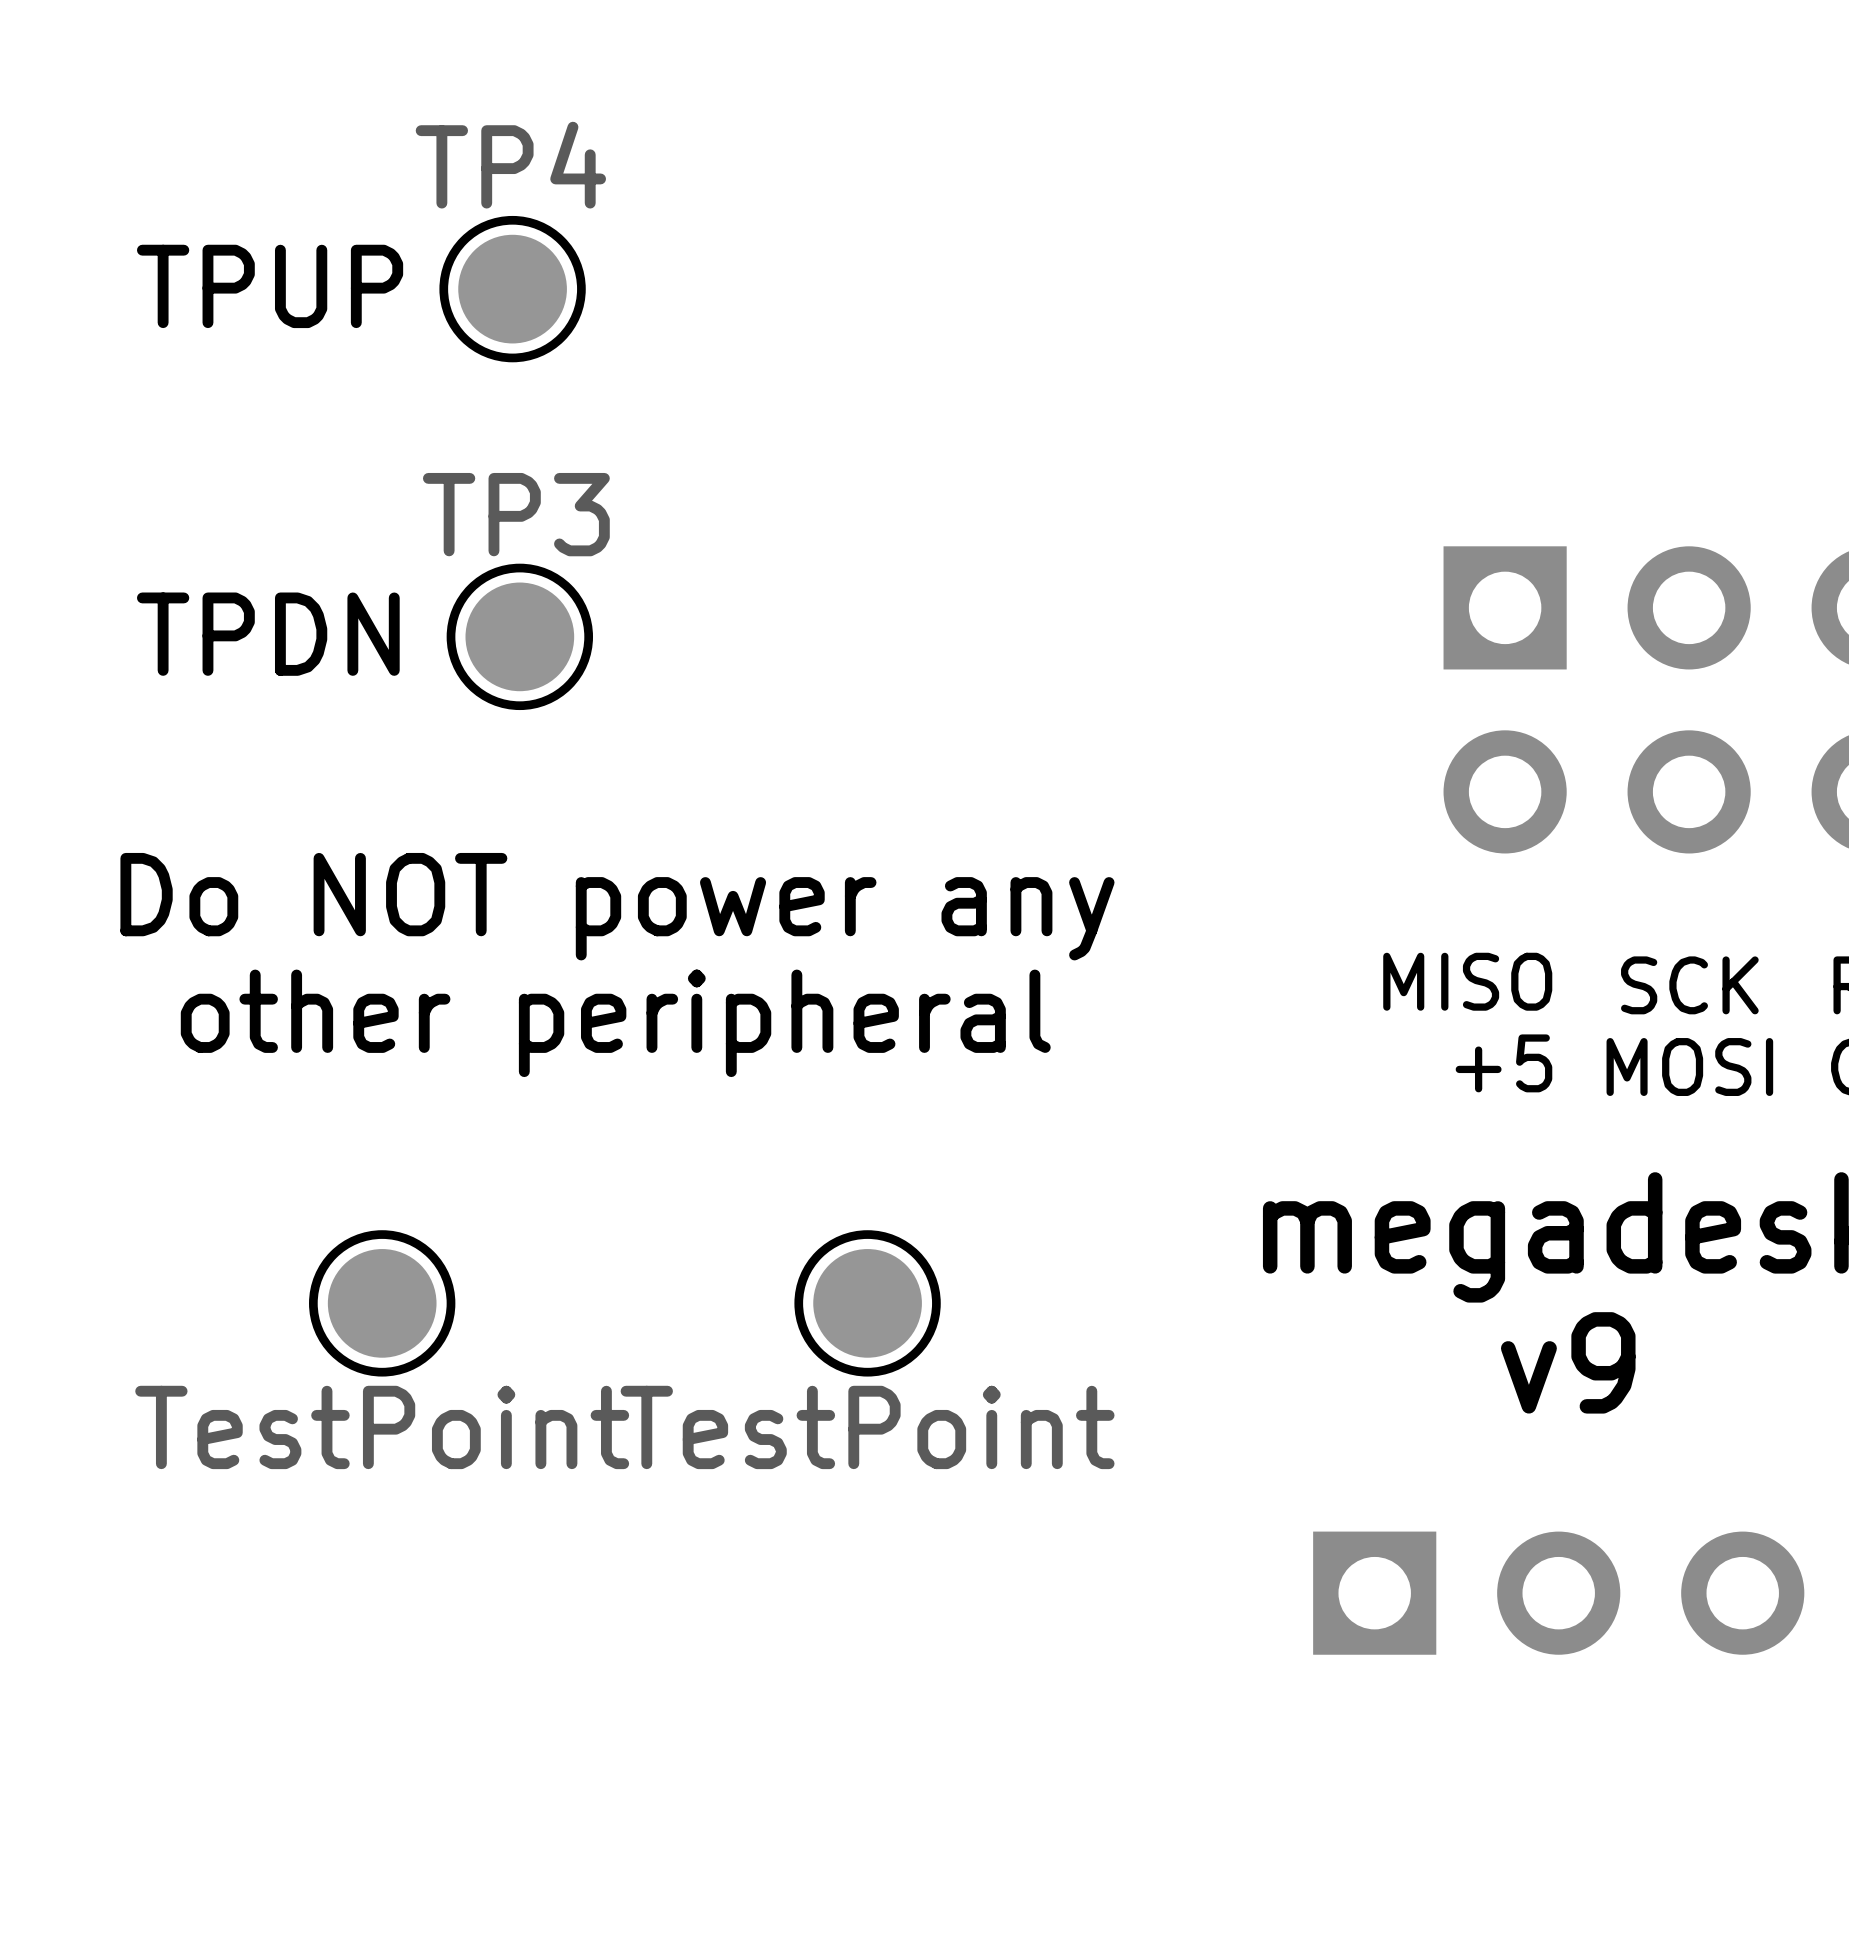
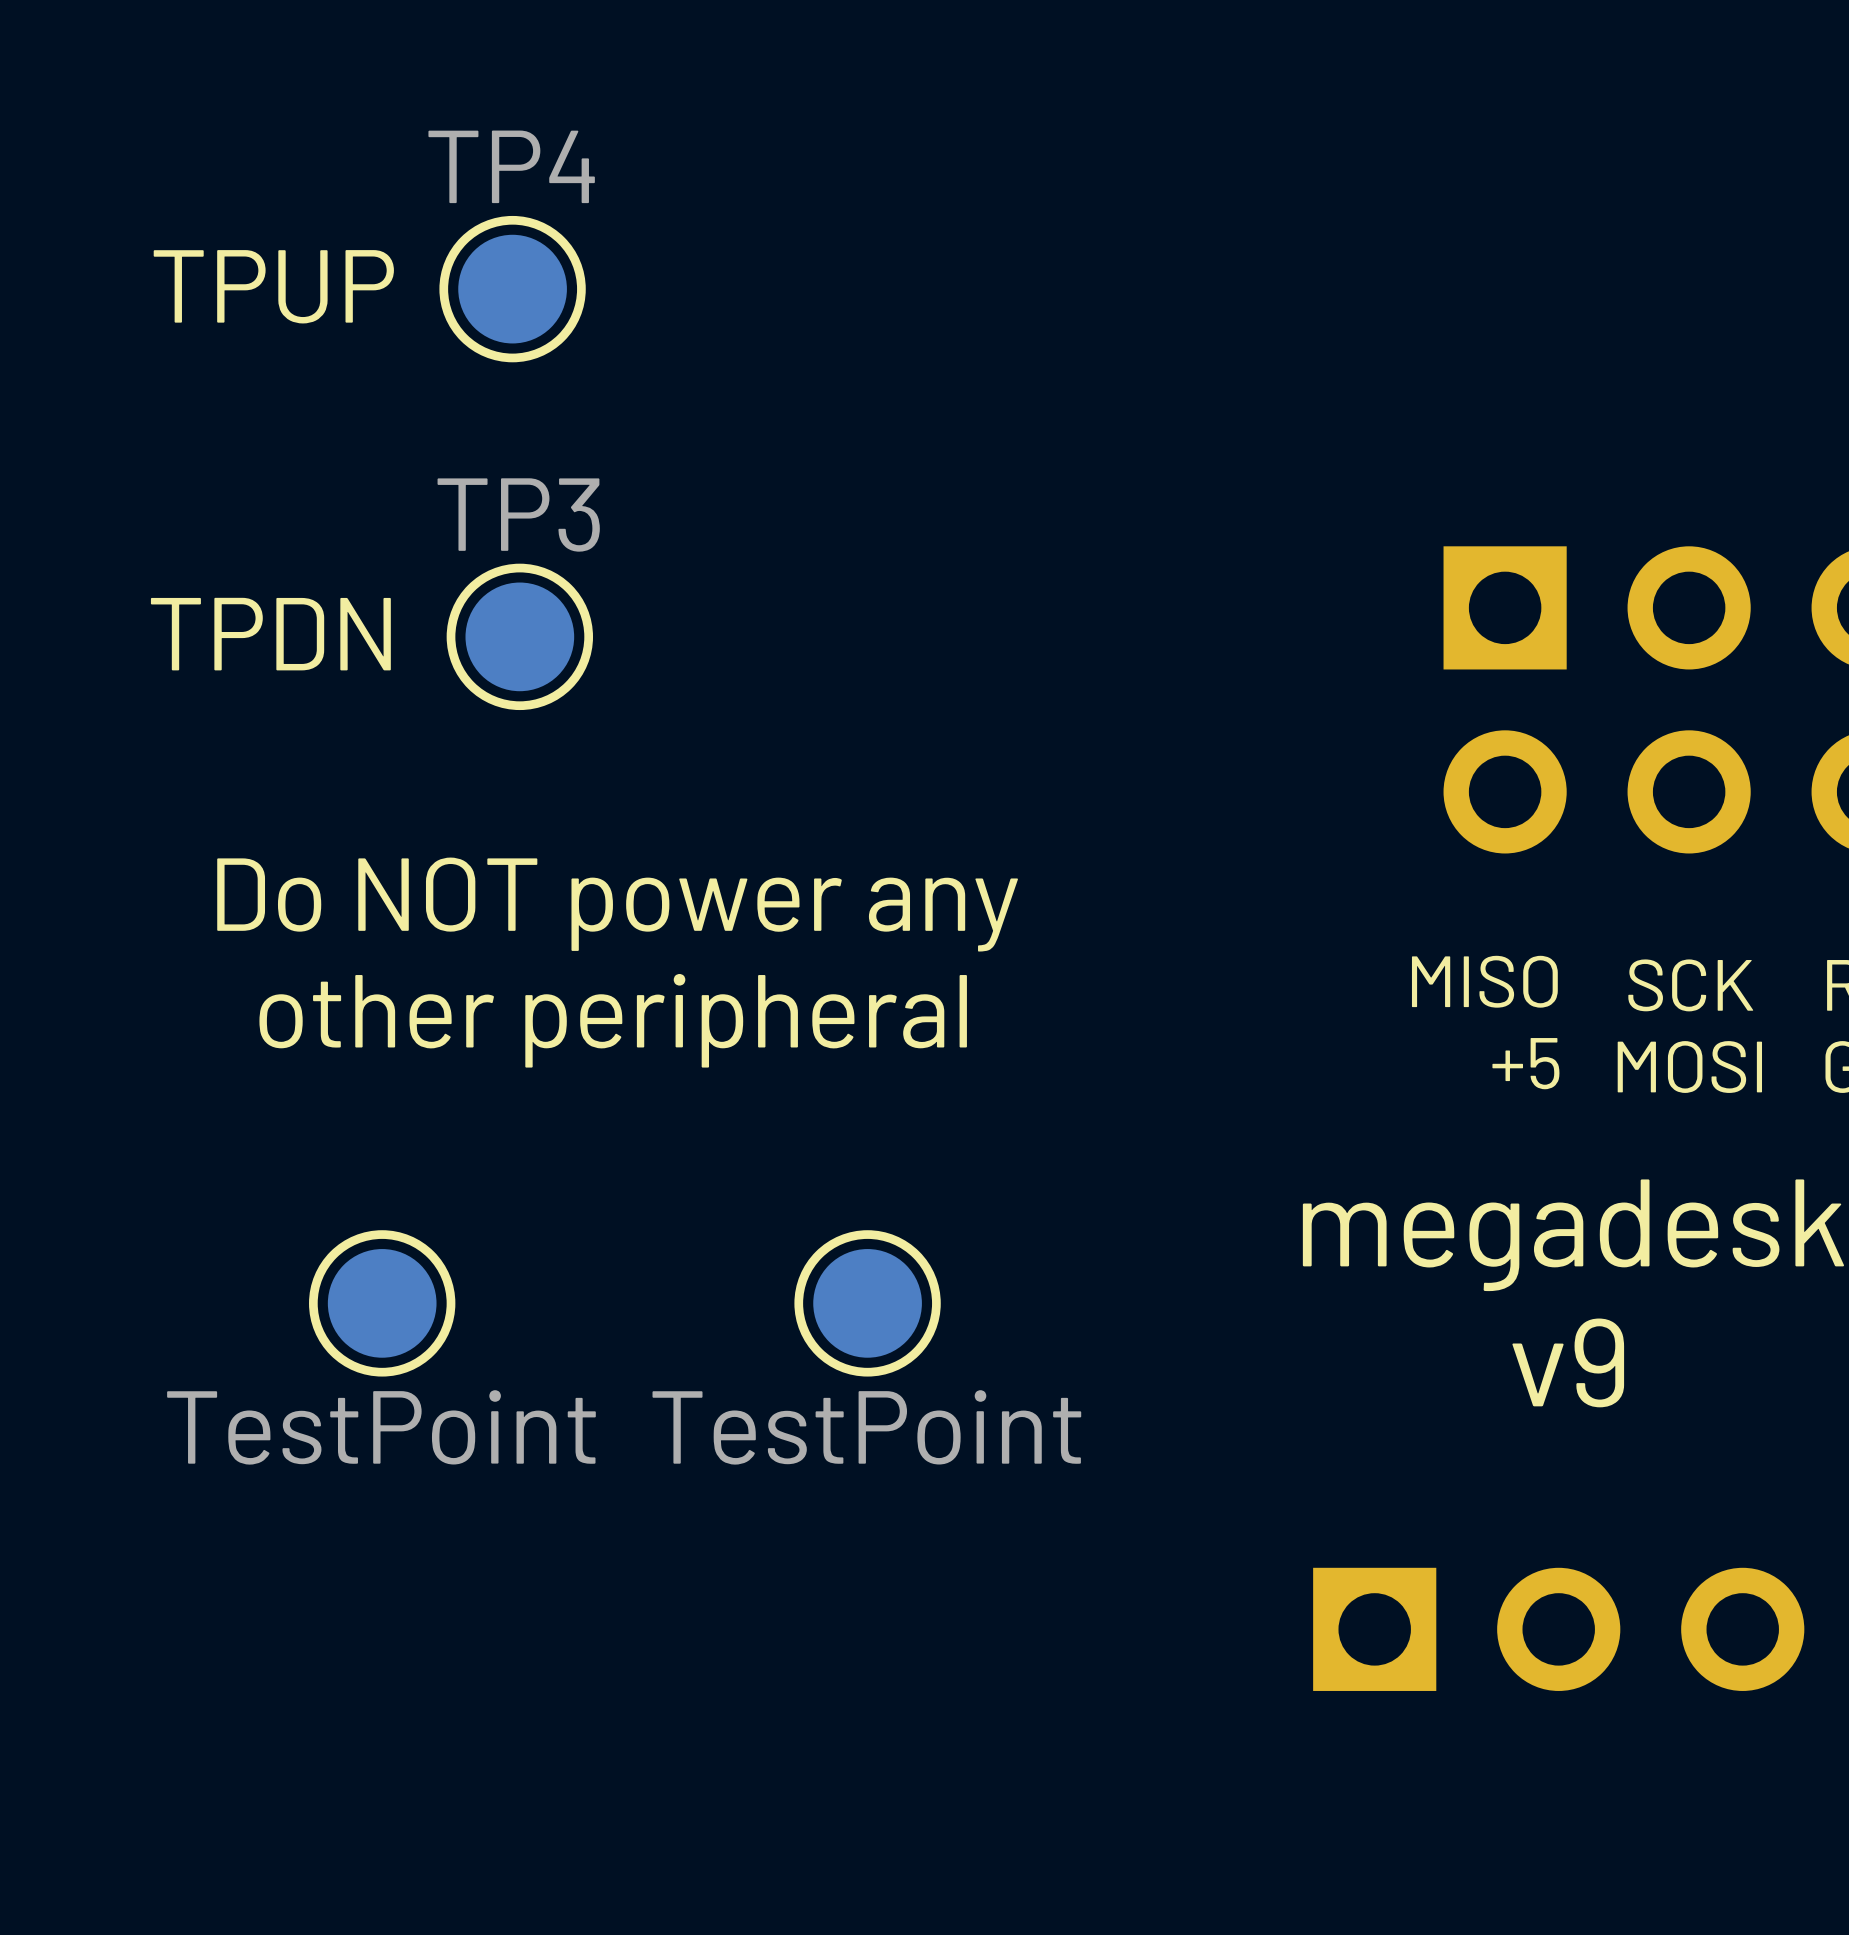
part position: (1558, 1593) -> (1558, 1629)

